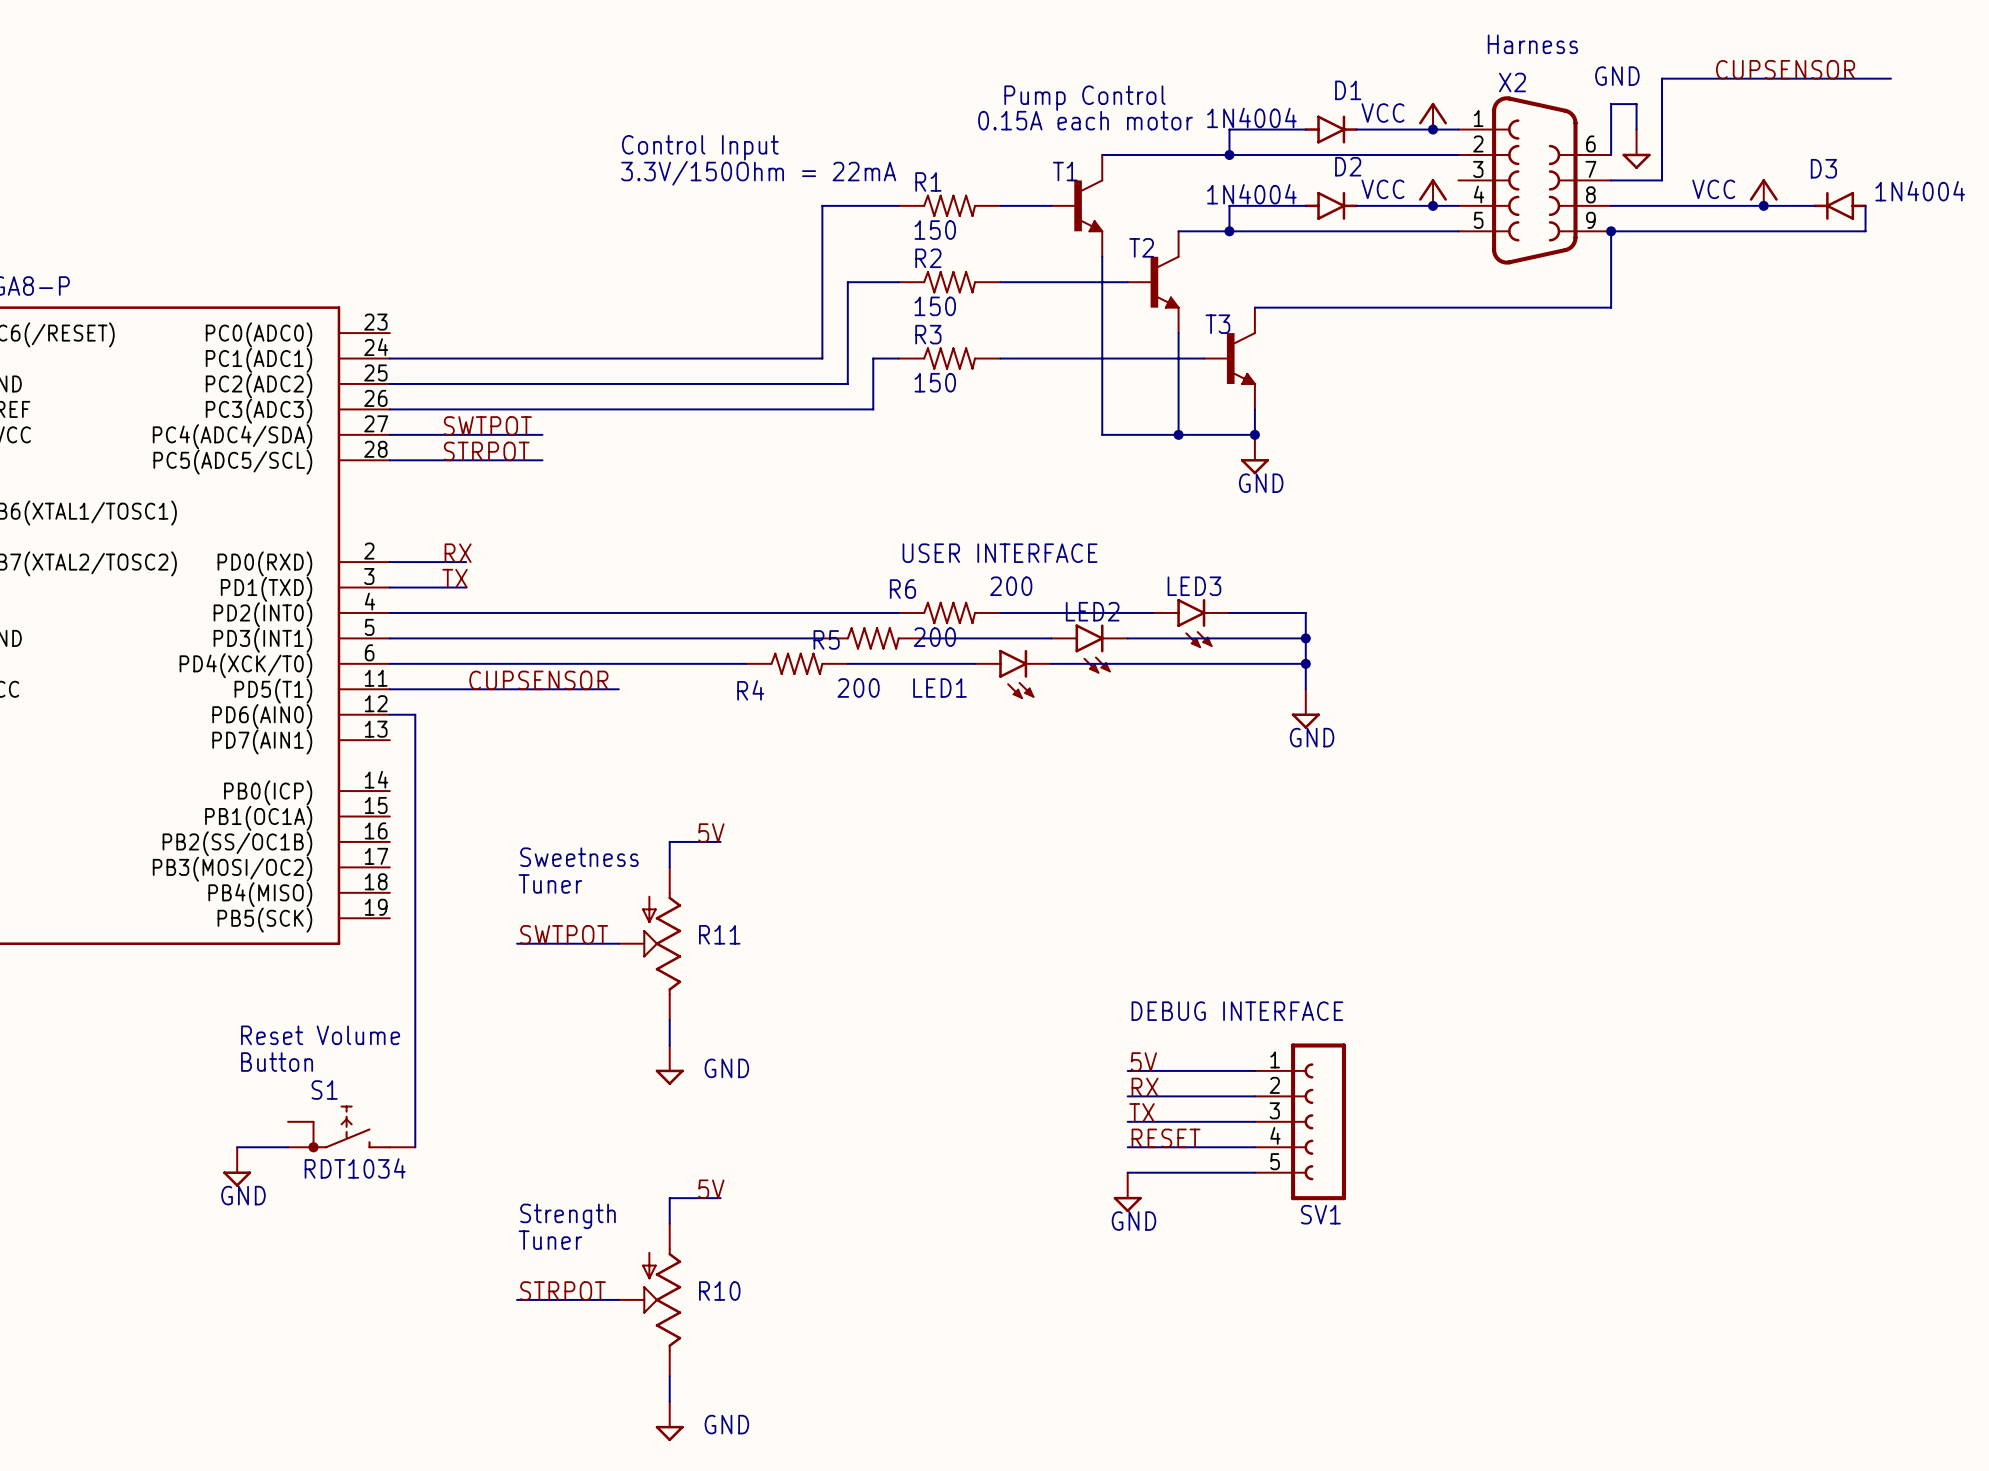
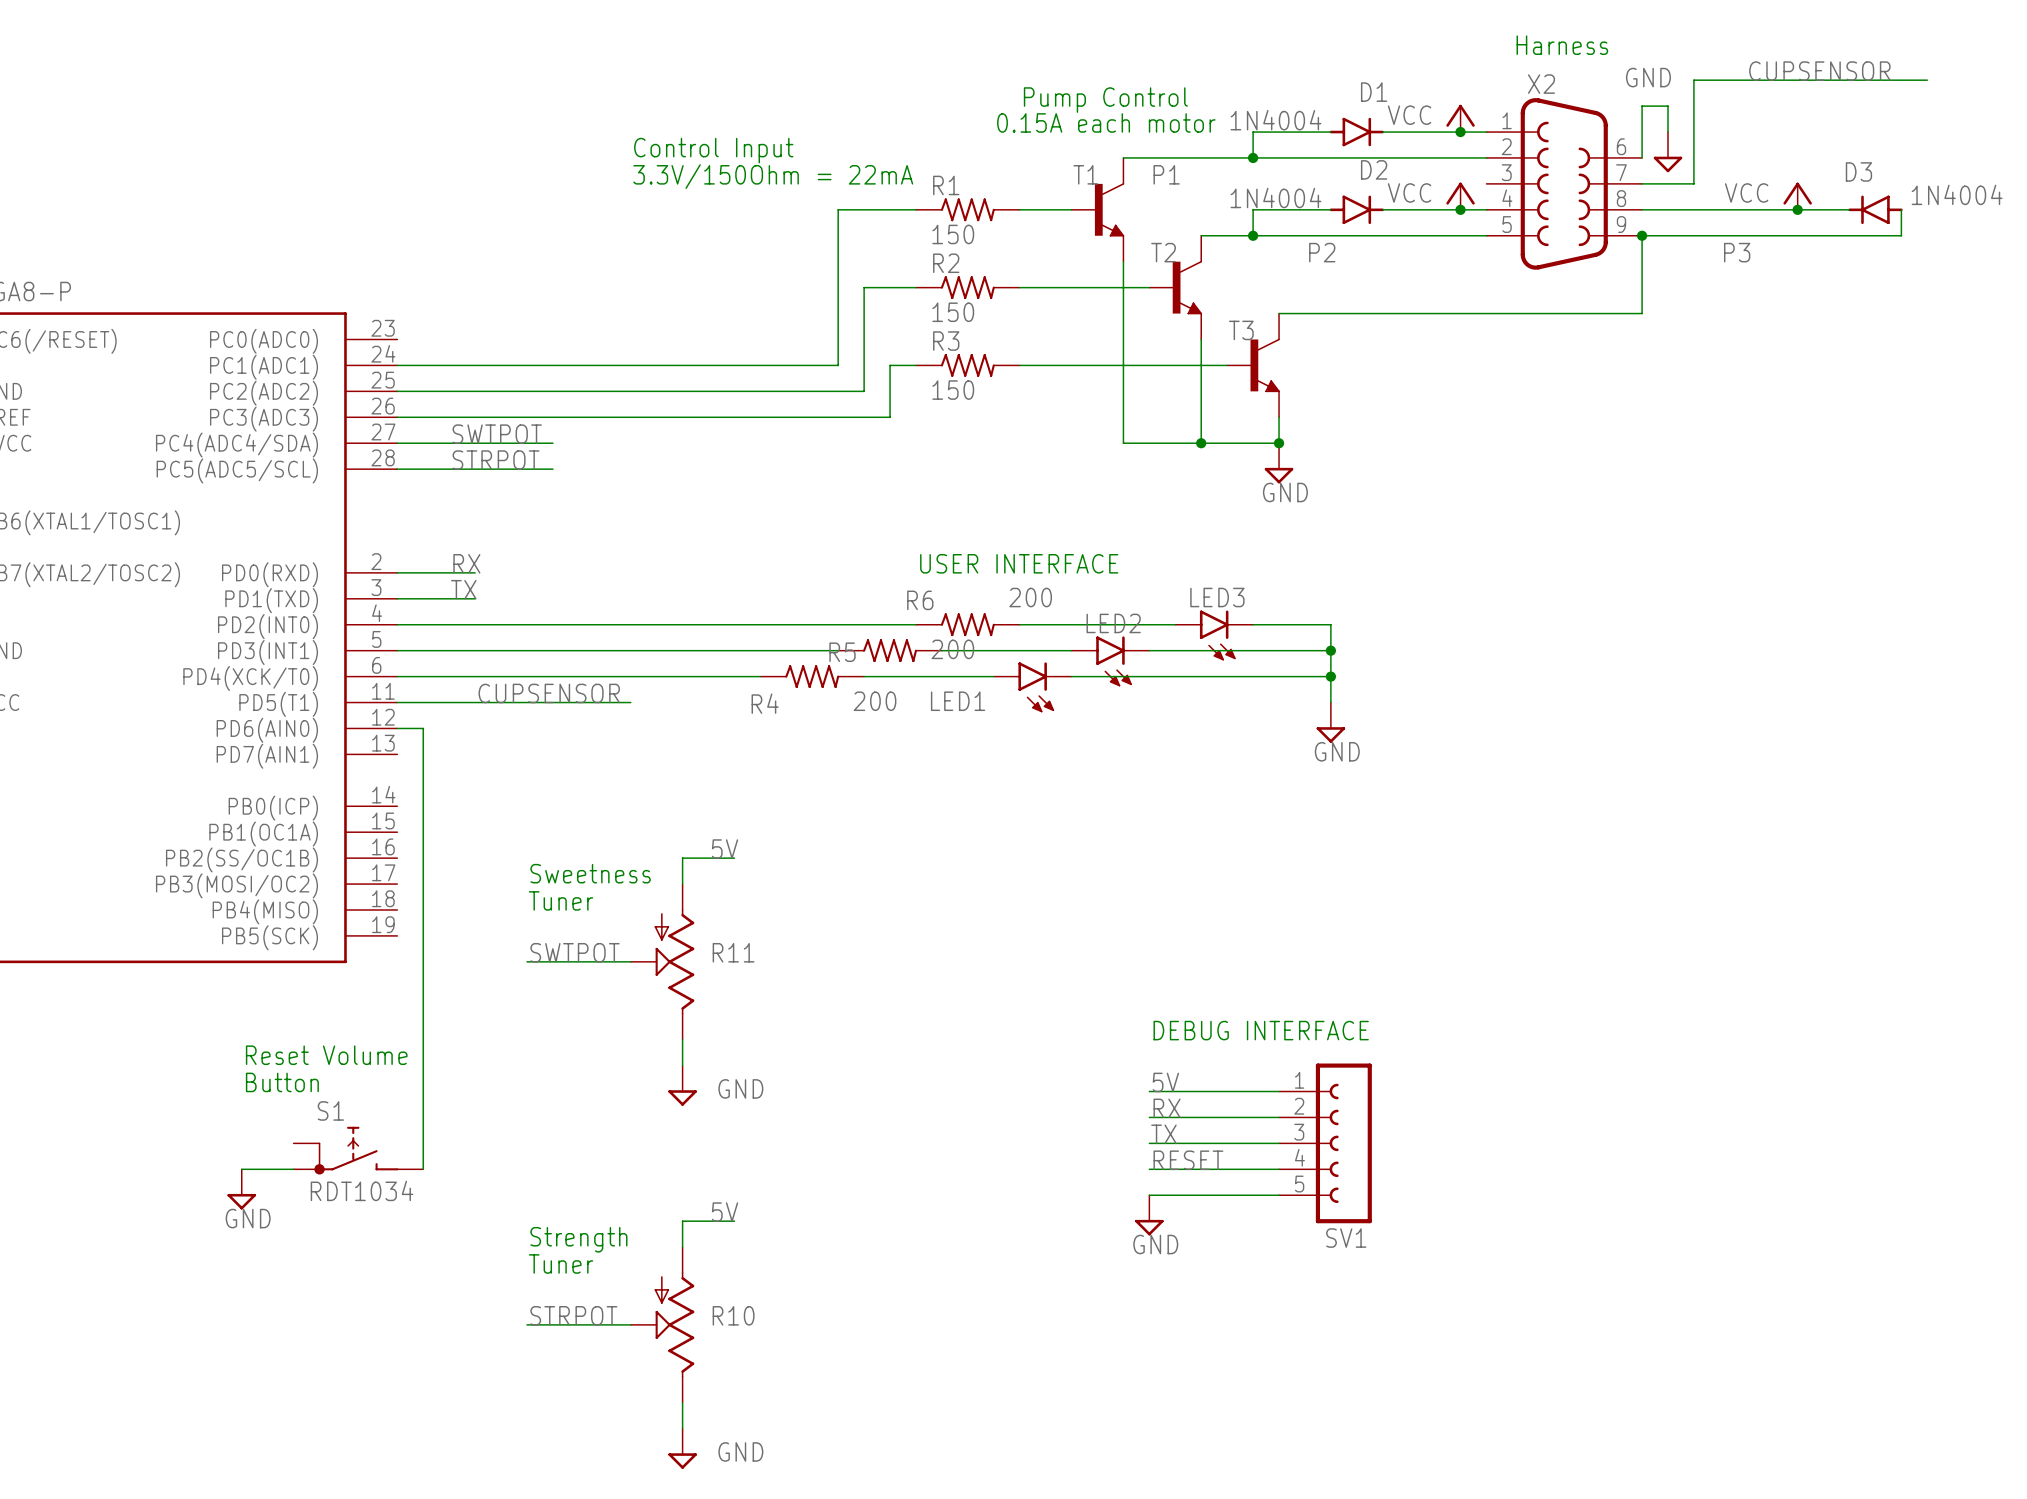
label: none -> P1 (1166, 174)
label: none -> P2 (1322, 252)
label: none -> P3 (1737, 252)

